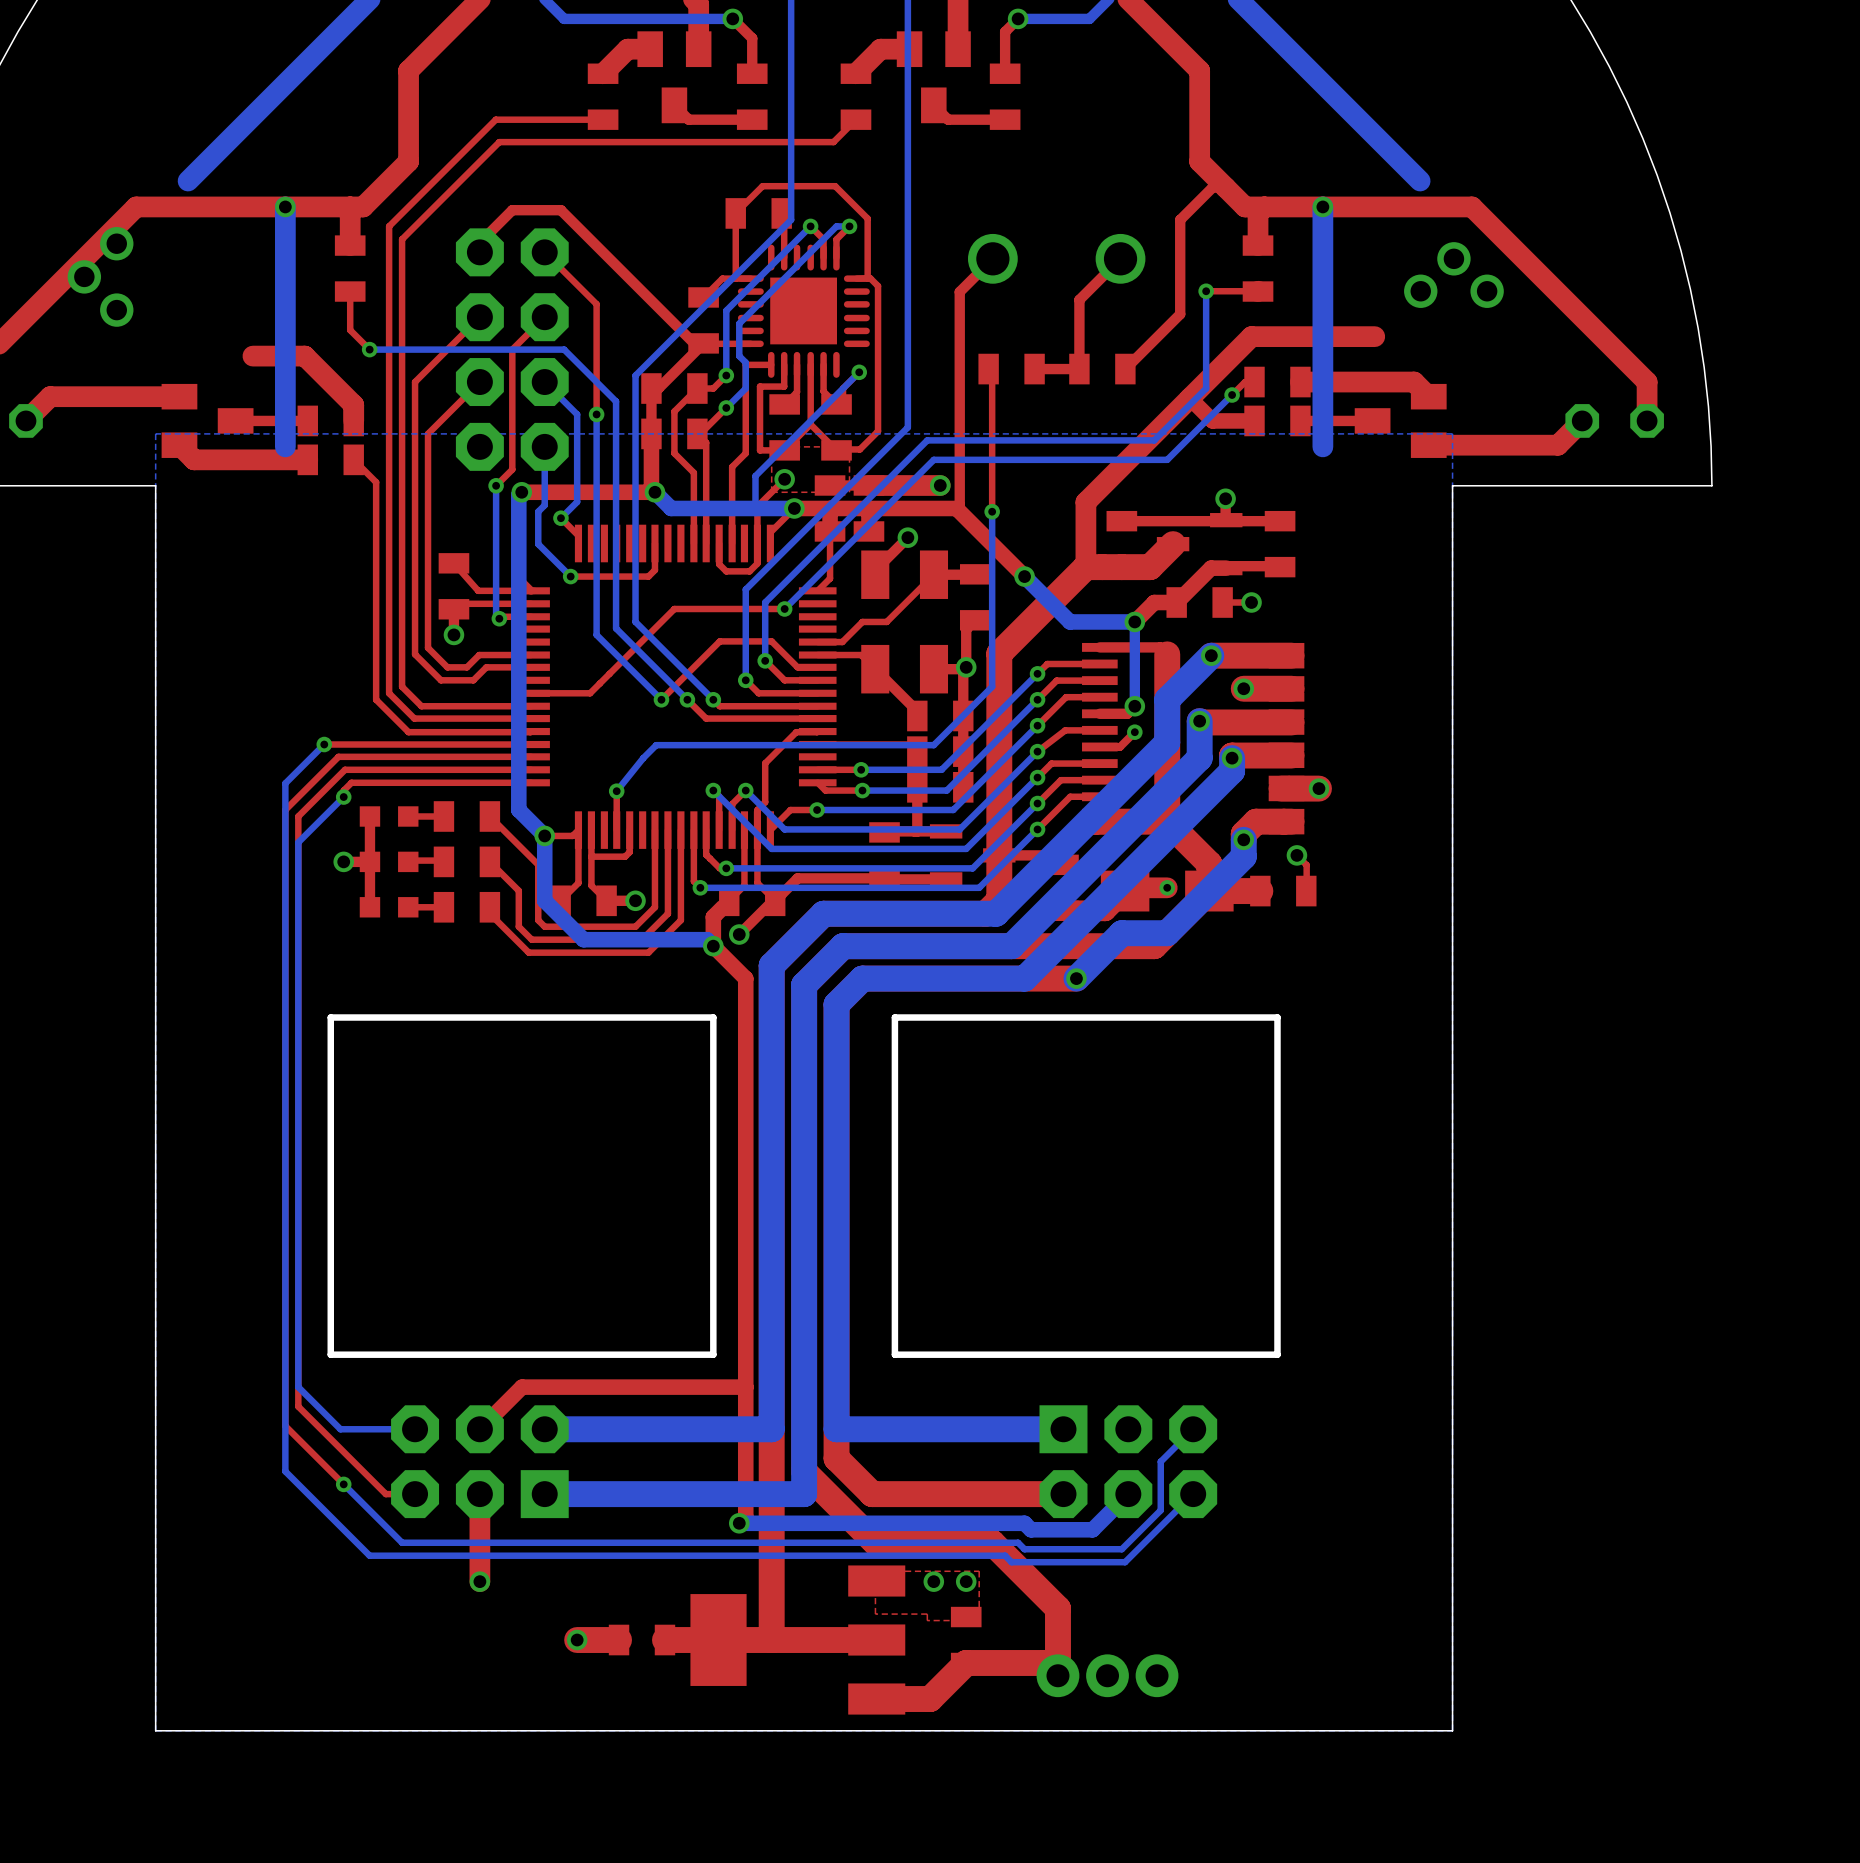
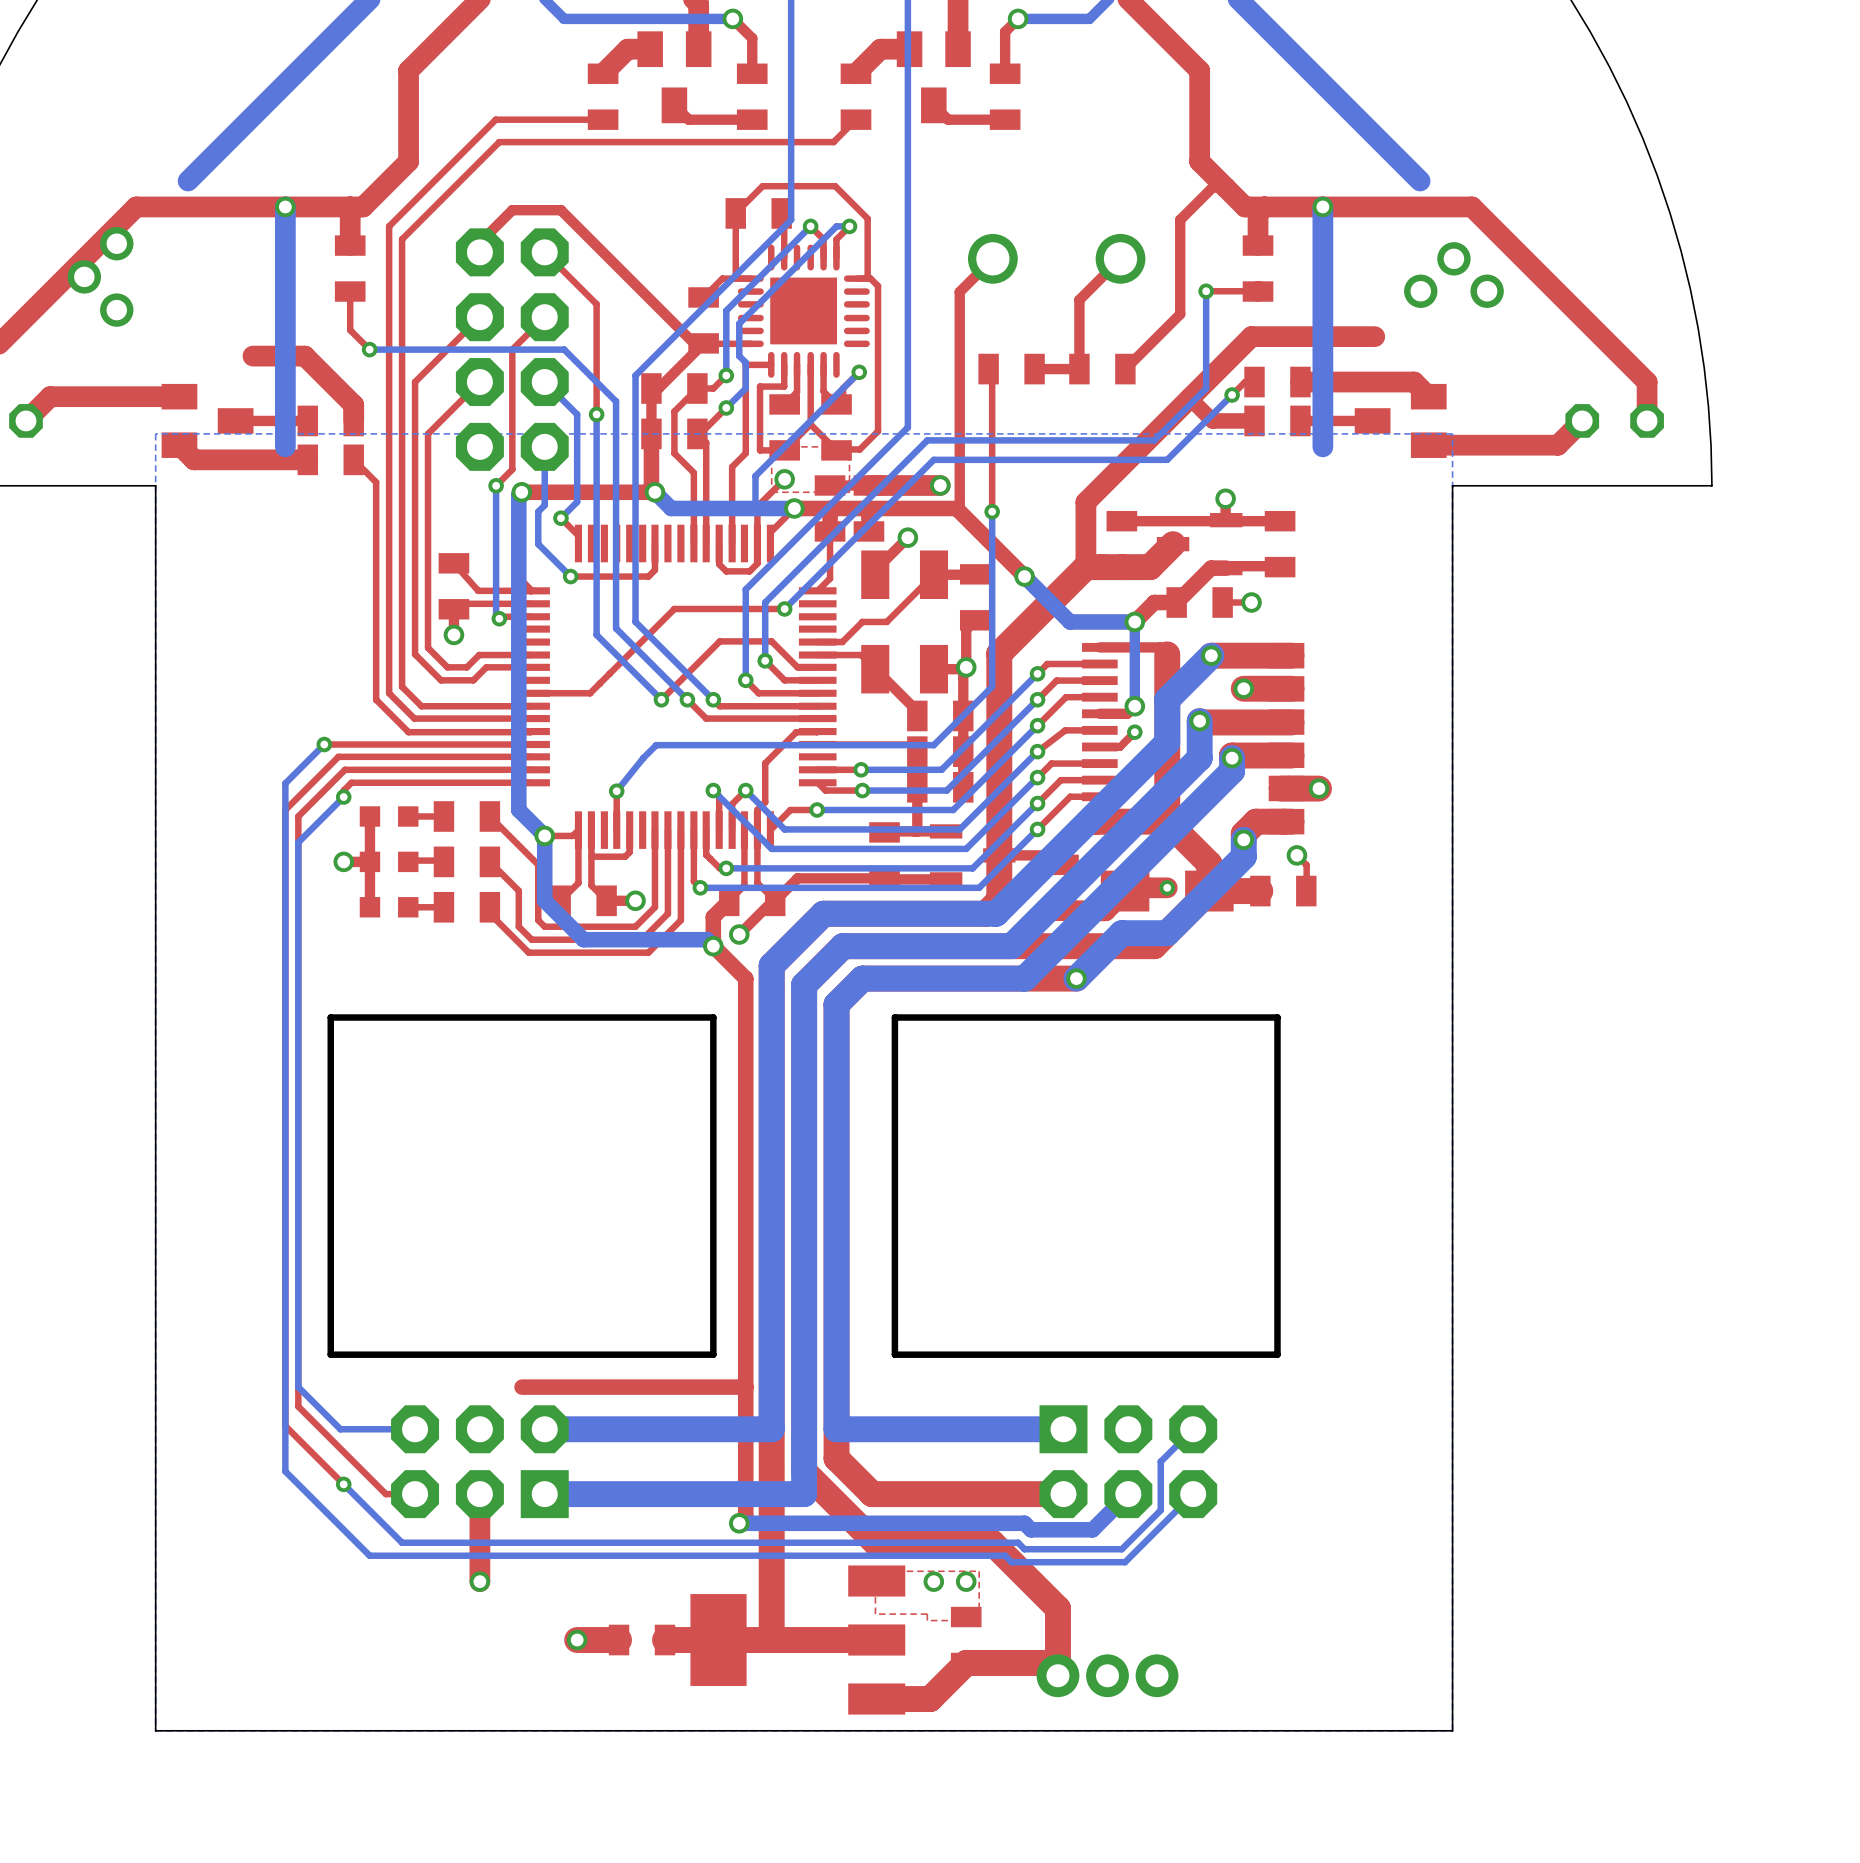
top track: (522, 1387) (479, 1429) -> none

